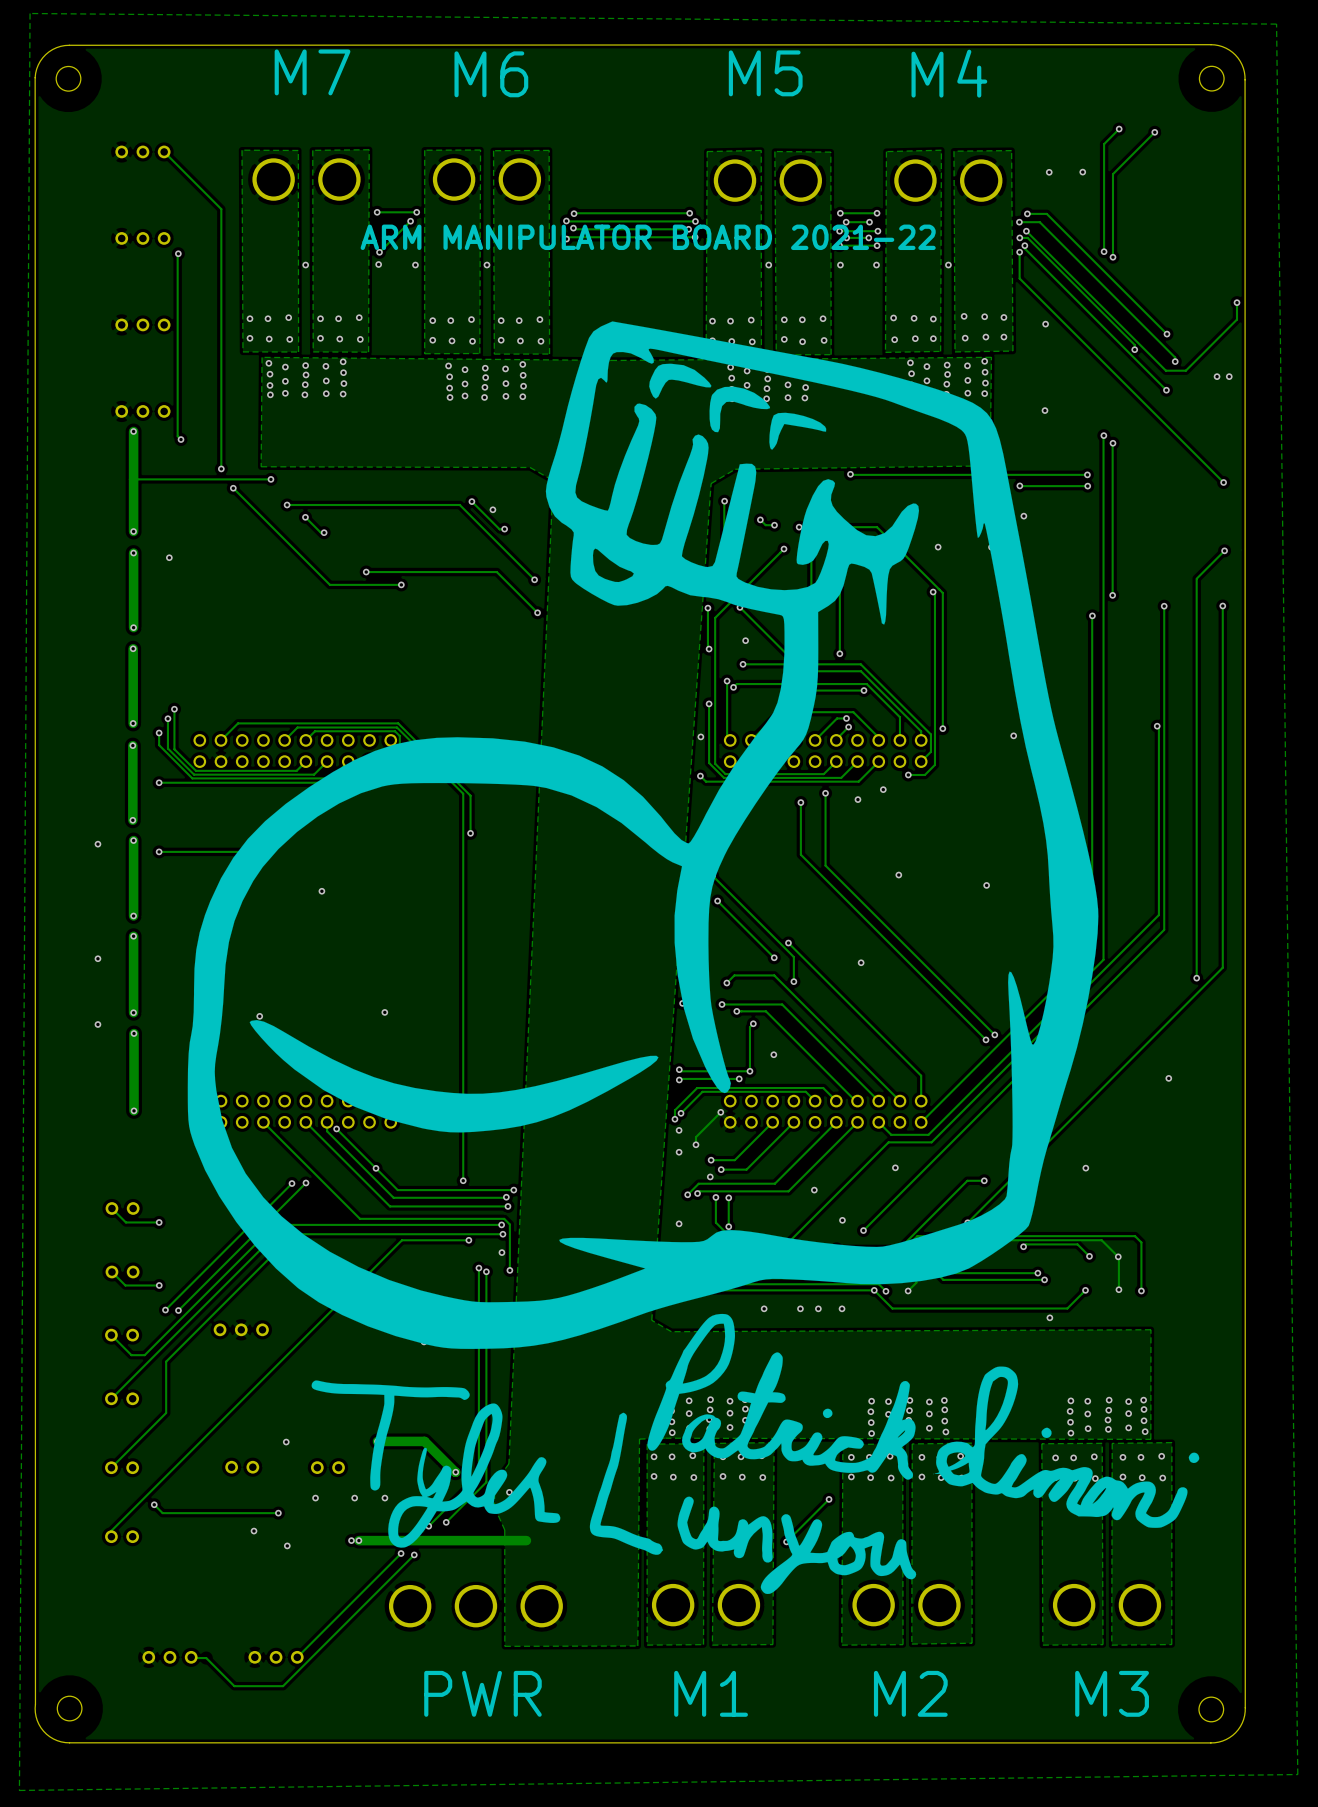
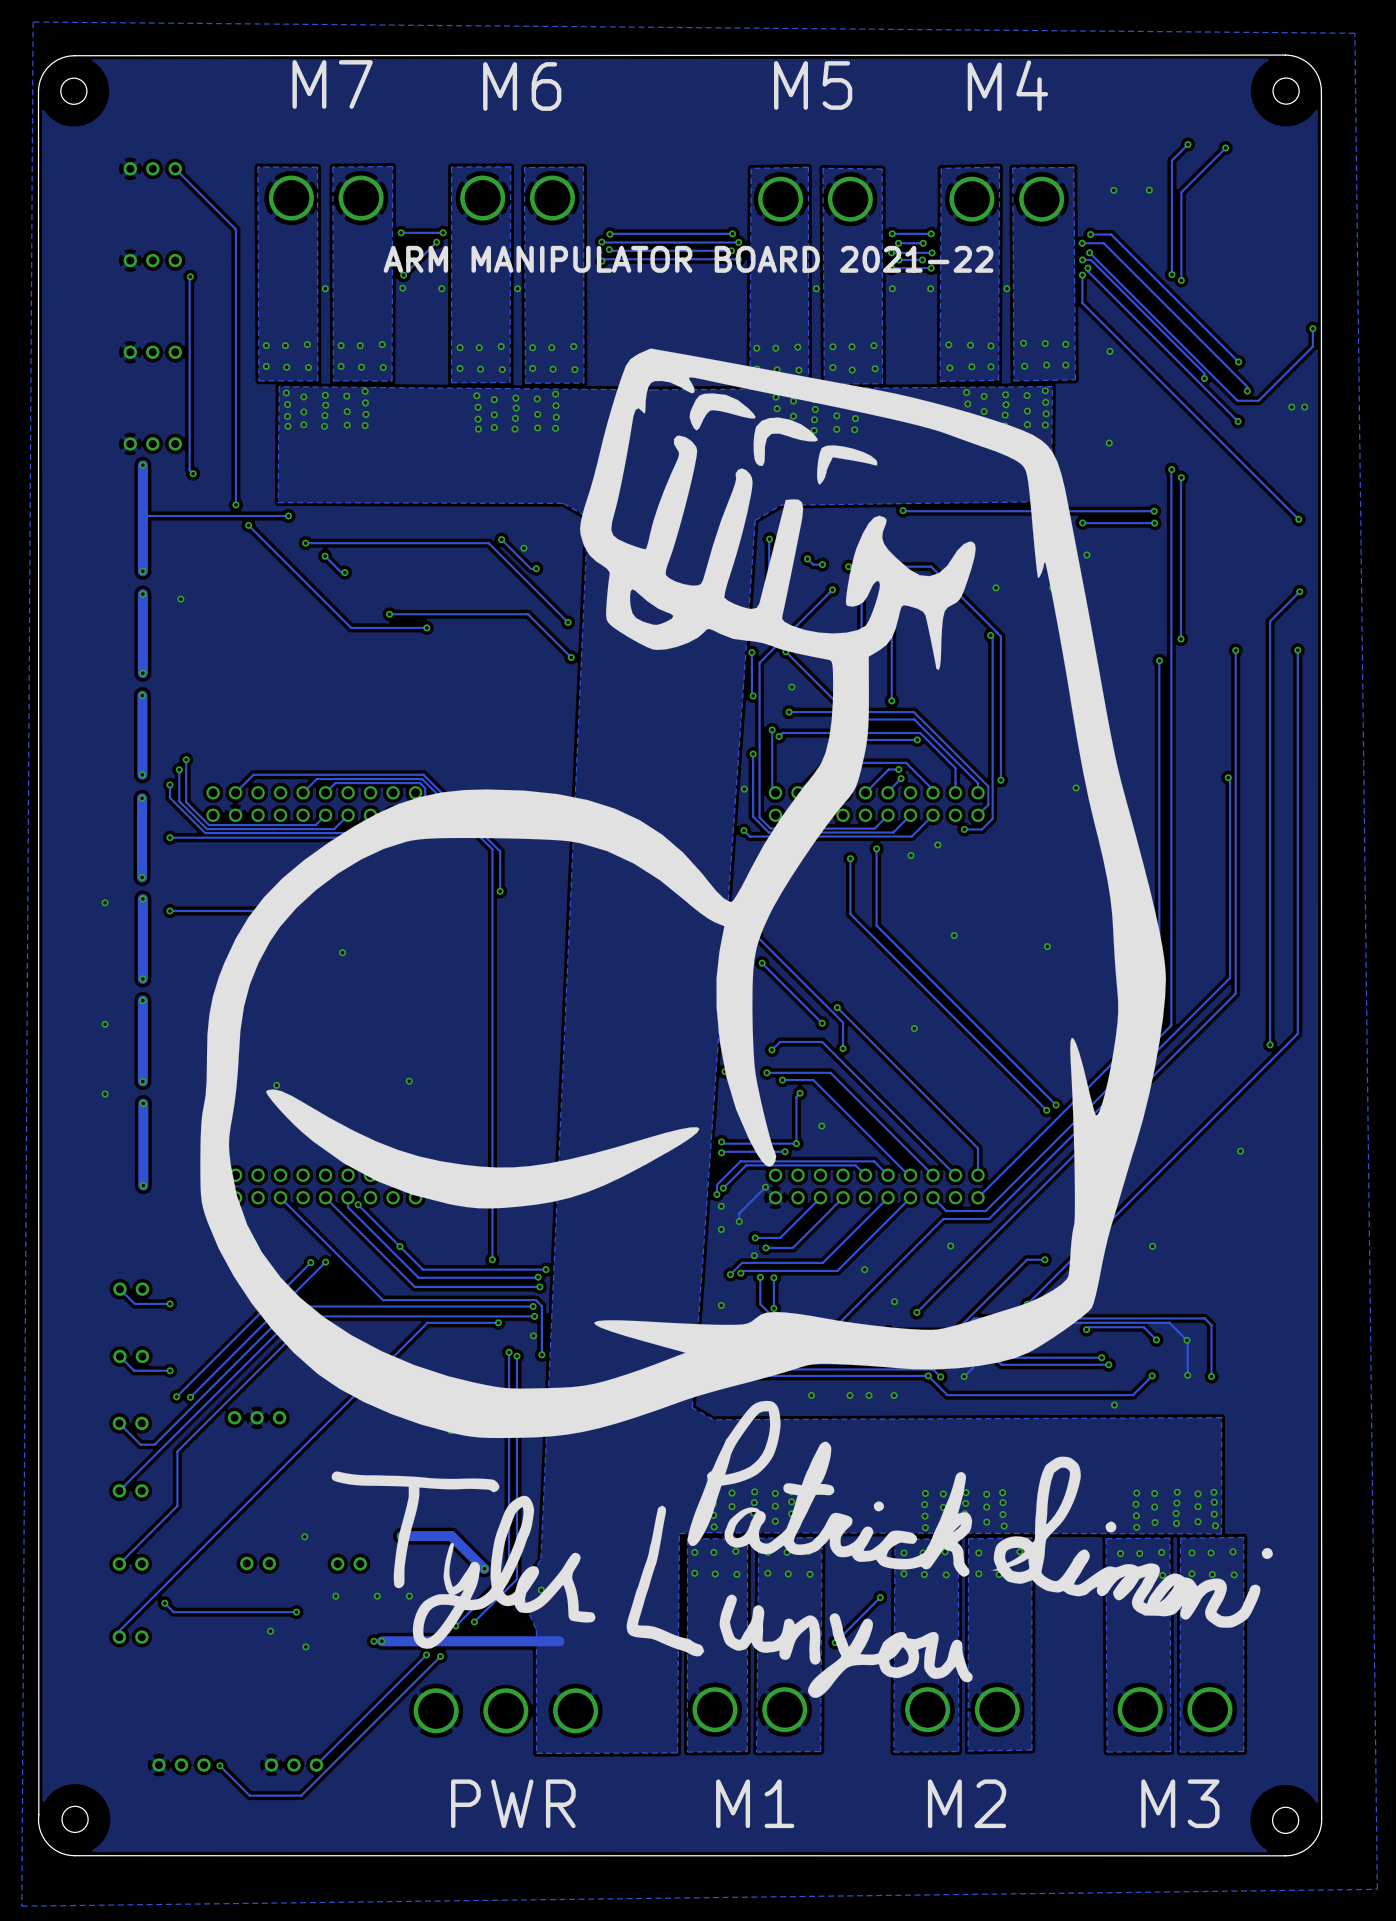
track: (191, 1657) (206, 1658) -> none
via: none -> (219, 1765)

